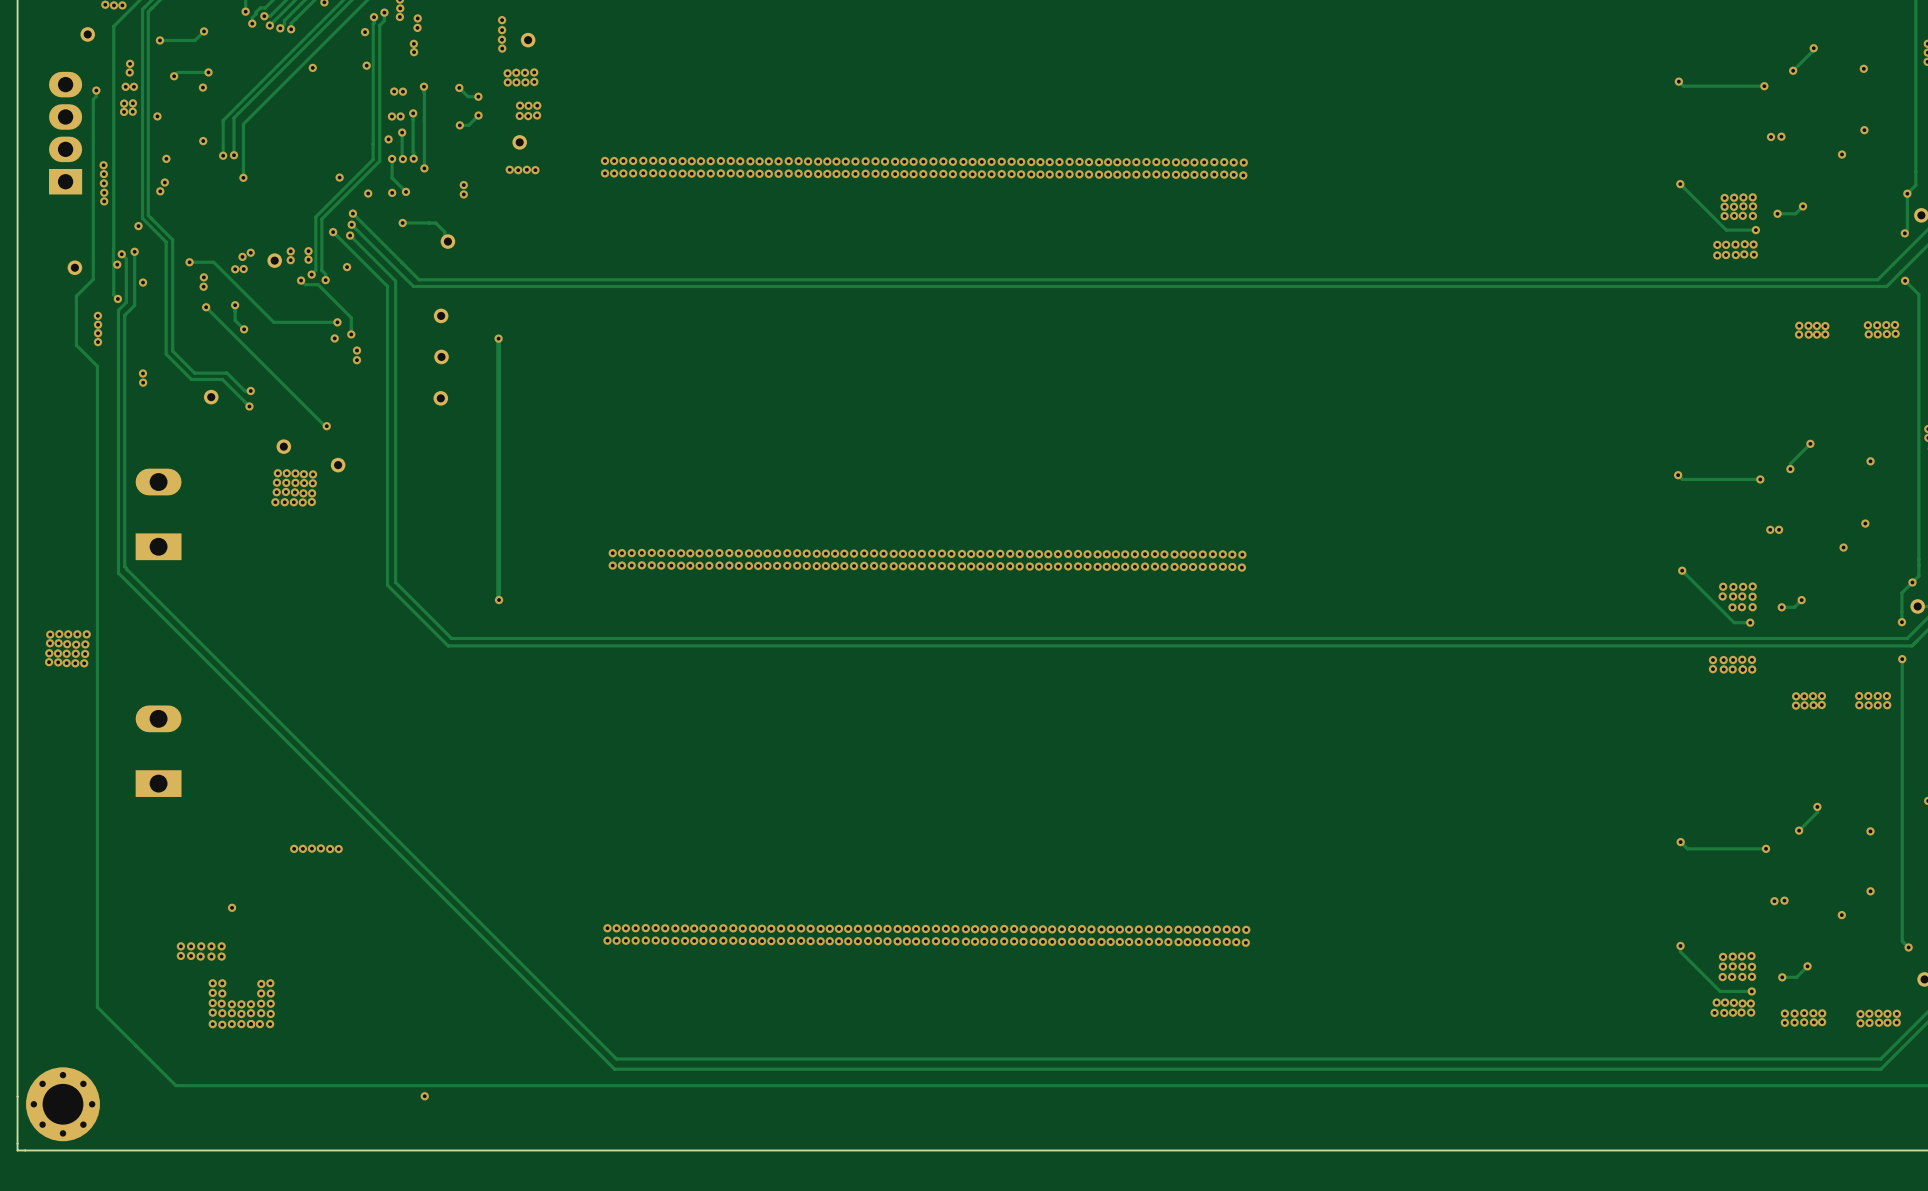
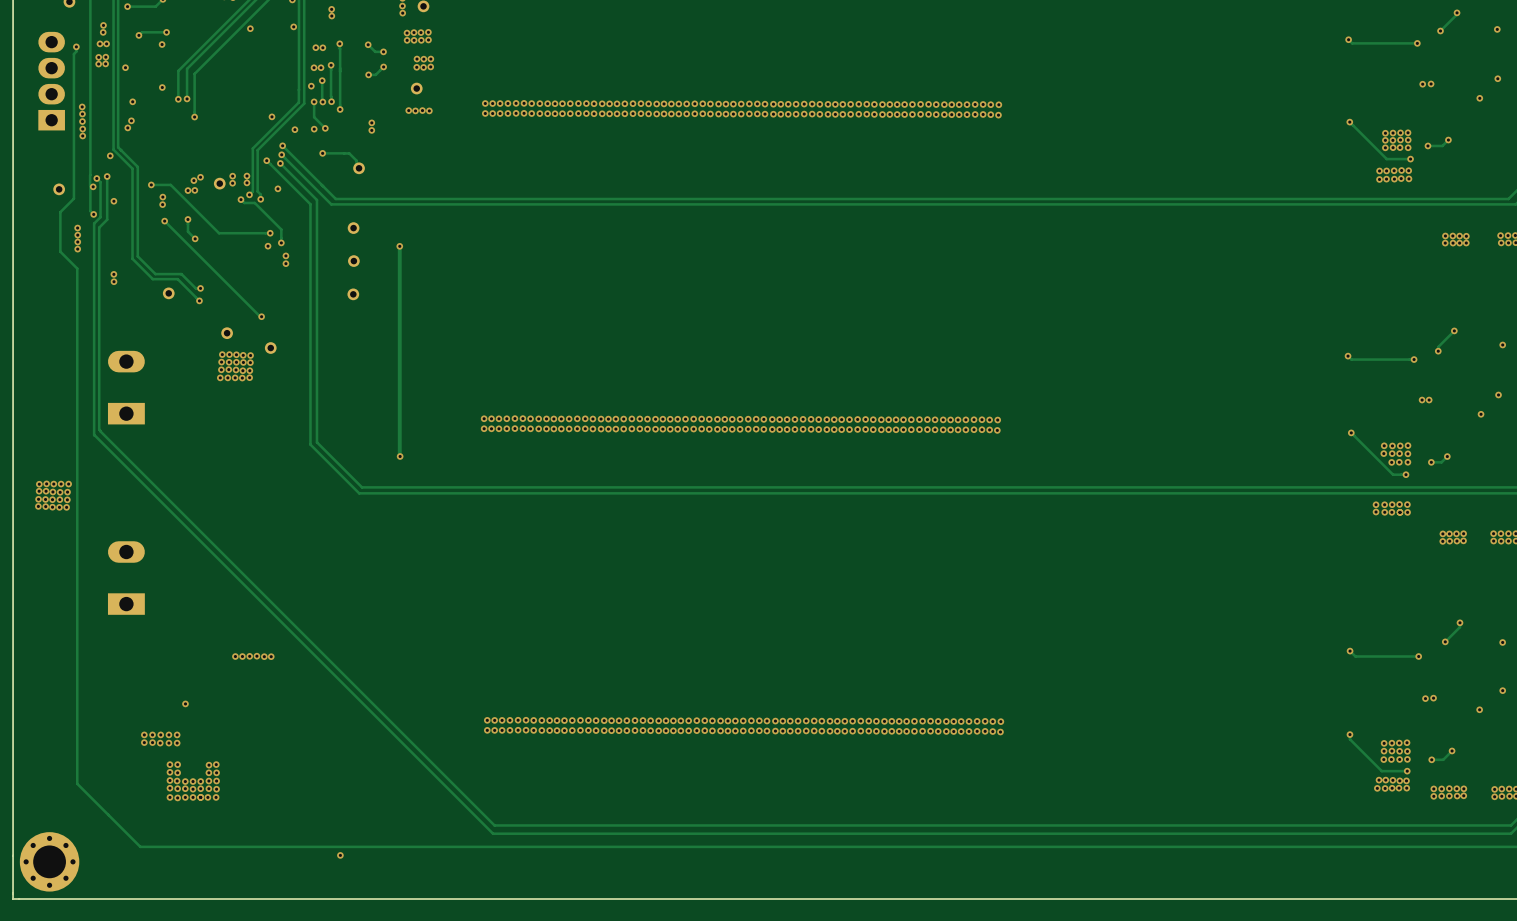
via: none -> (484, 418)
via: none -> (484, 428)

